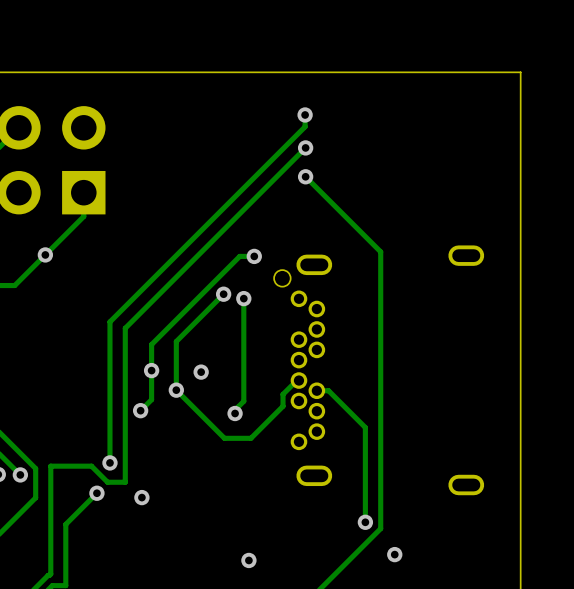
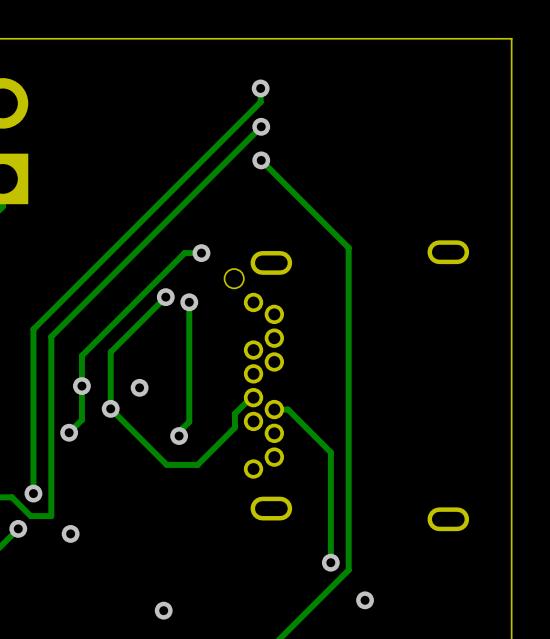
via: (248, 560) -> none
via: none -> (163, 610)

